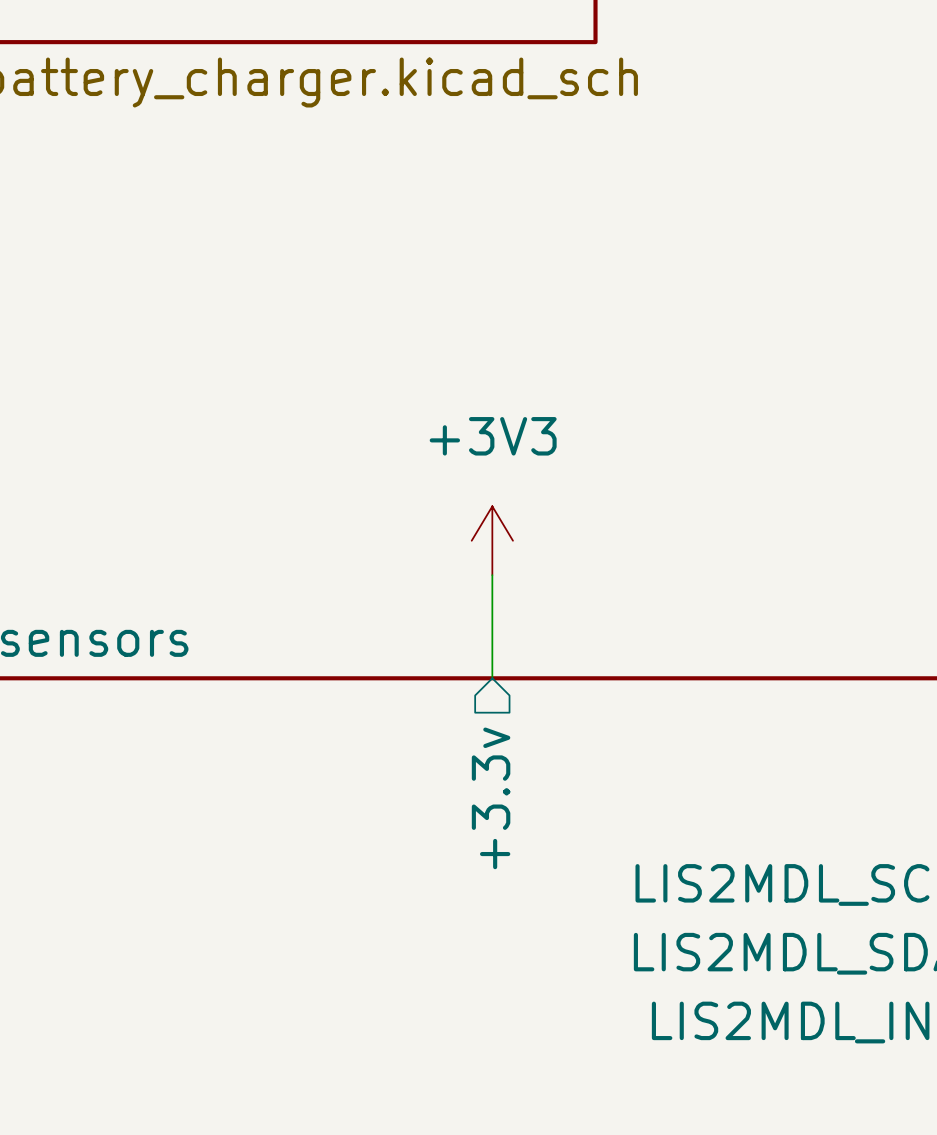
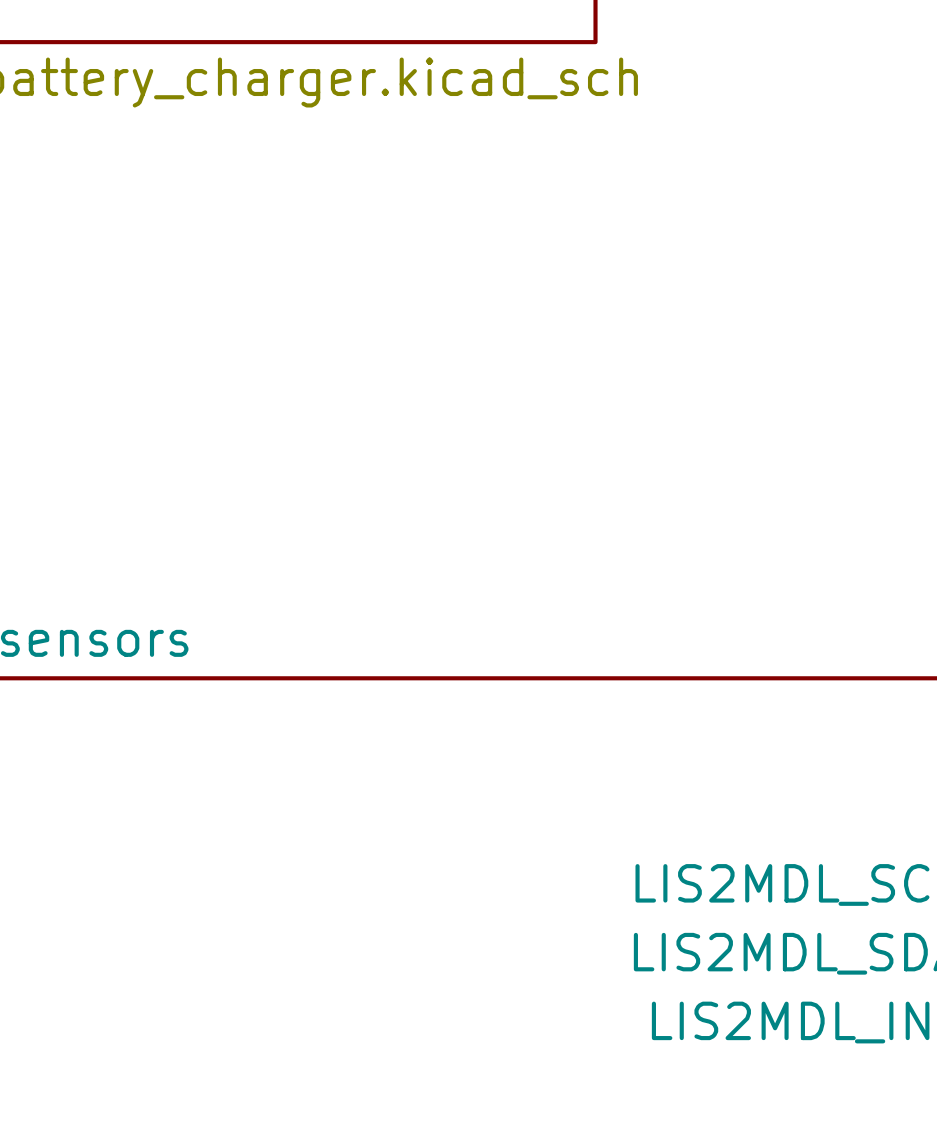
power symbol: +3V3 (492, 540) -> none
wire: (492, 575) (492, 678) -> none
sheet pin: +3.3v (491, 798) -> none

